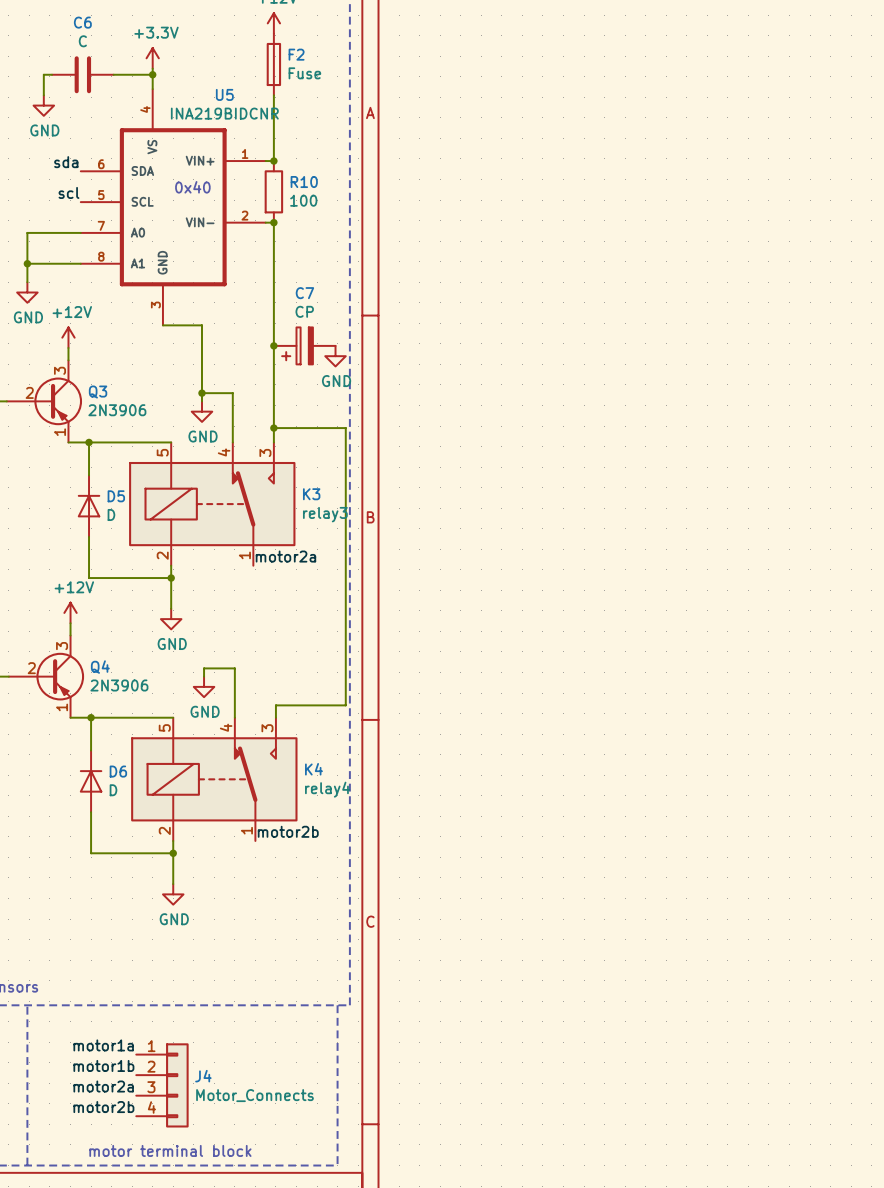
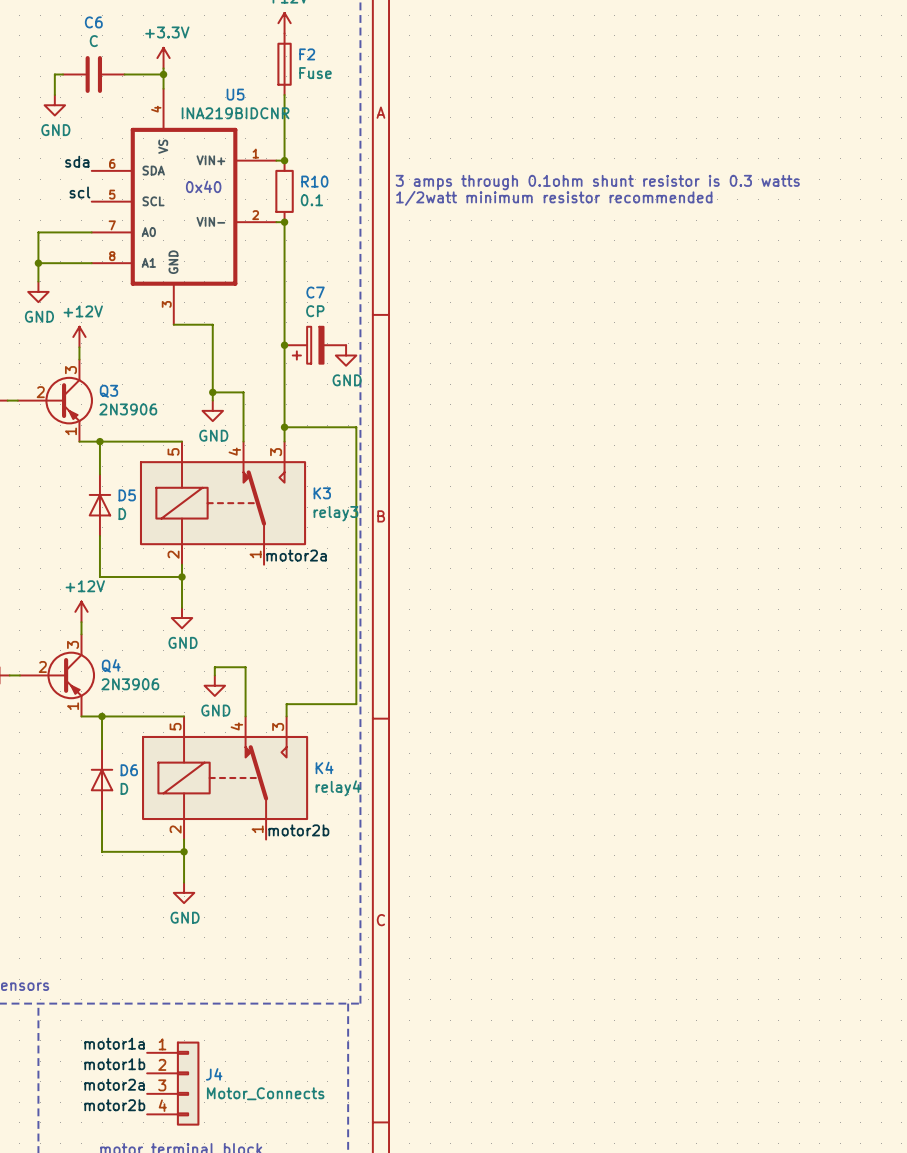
text: none -> 3 amps through 0.1ohm shunt resistor is 0.3 watts (597, 182)
text: none -> 1/2watt minimum resistor recommended (554, 198)
R10 value: 100 (303, 200) -> 0.1 (311, 200)

